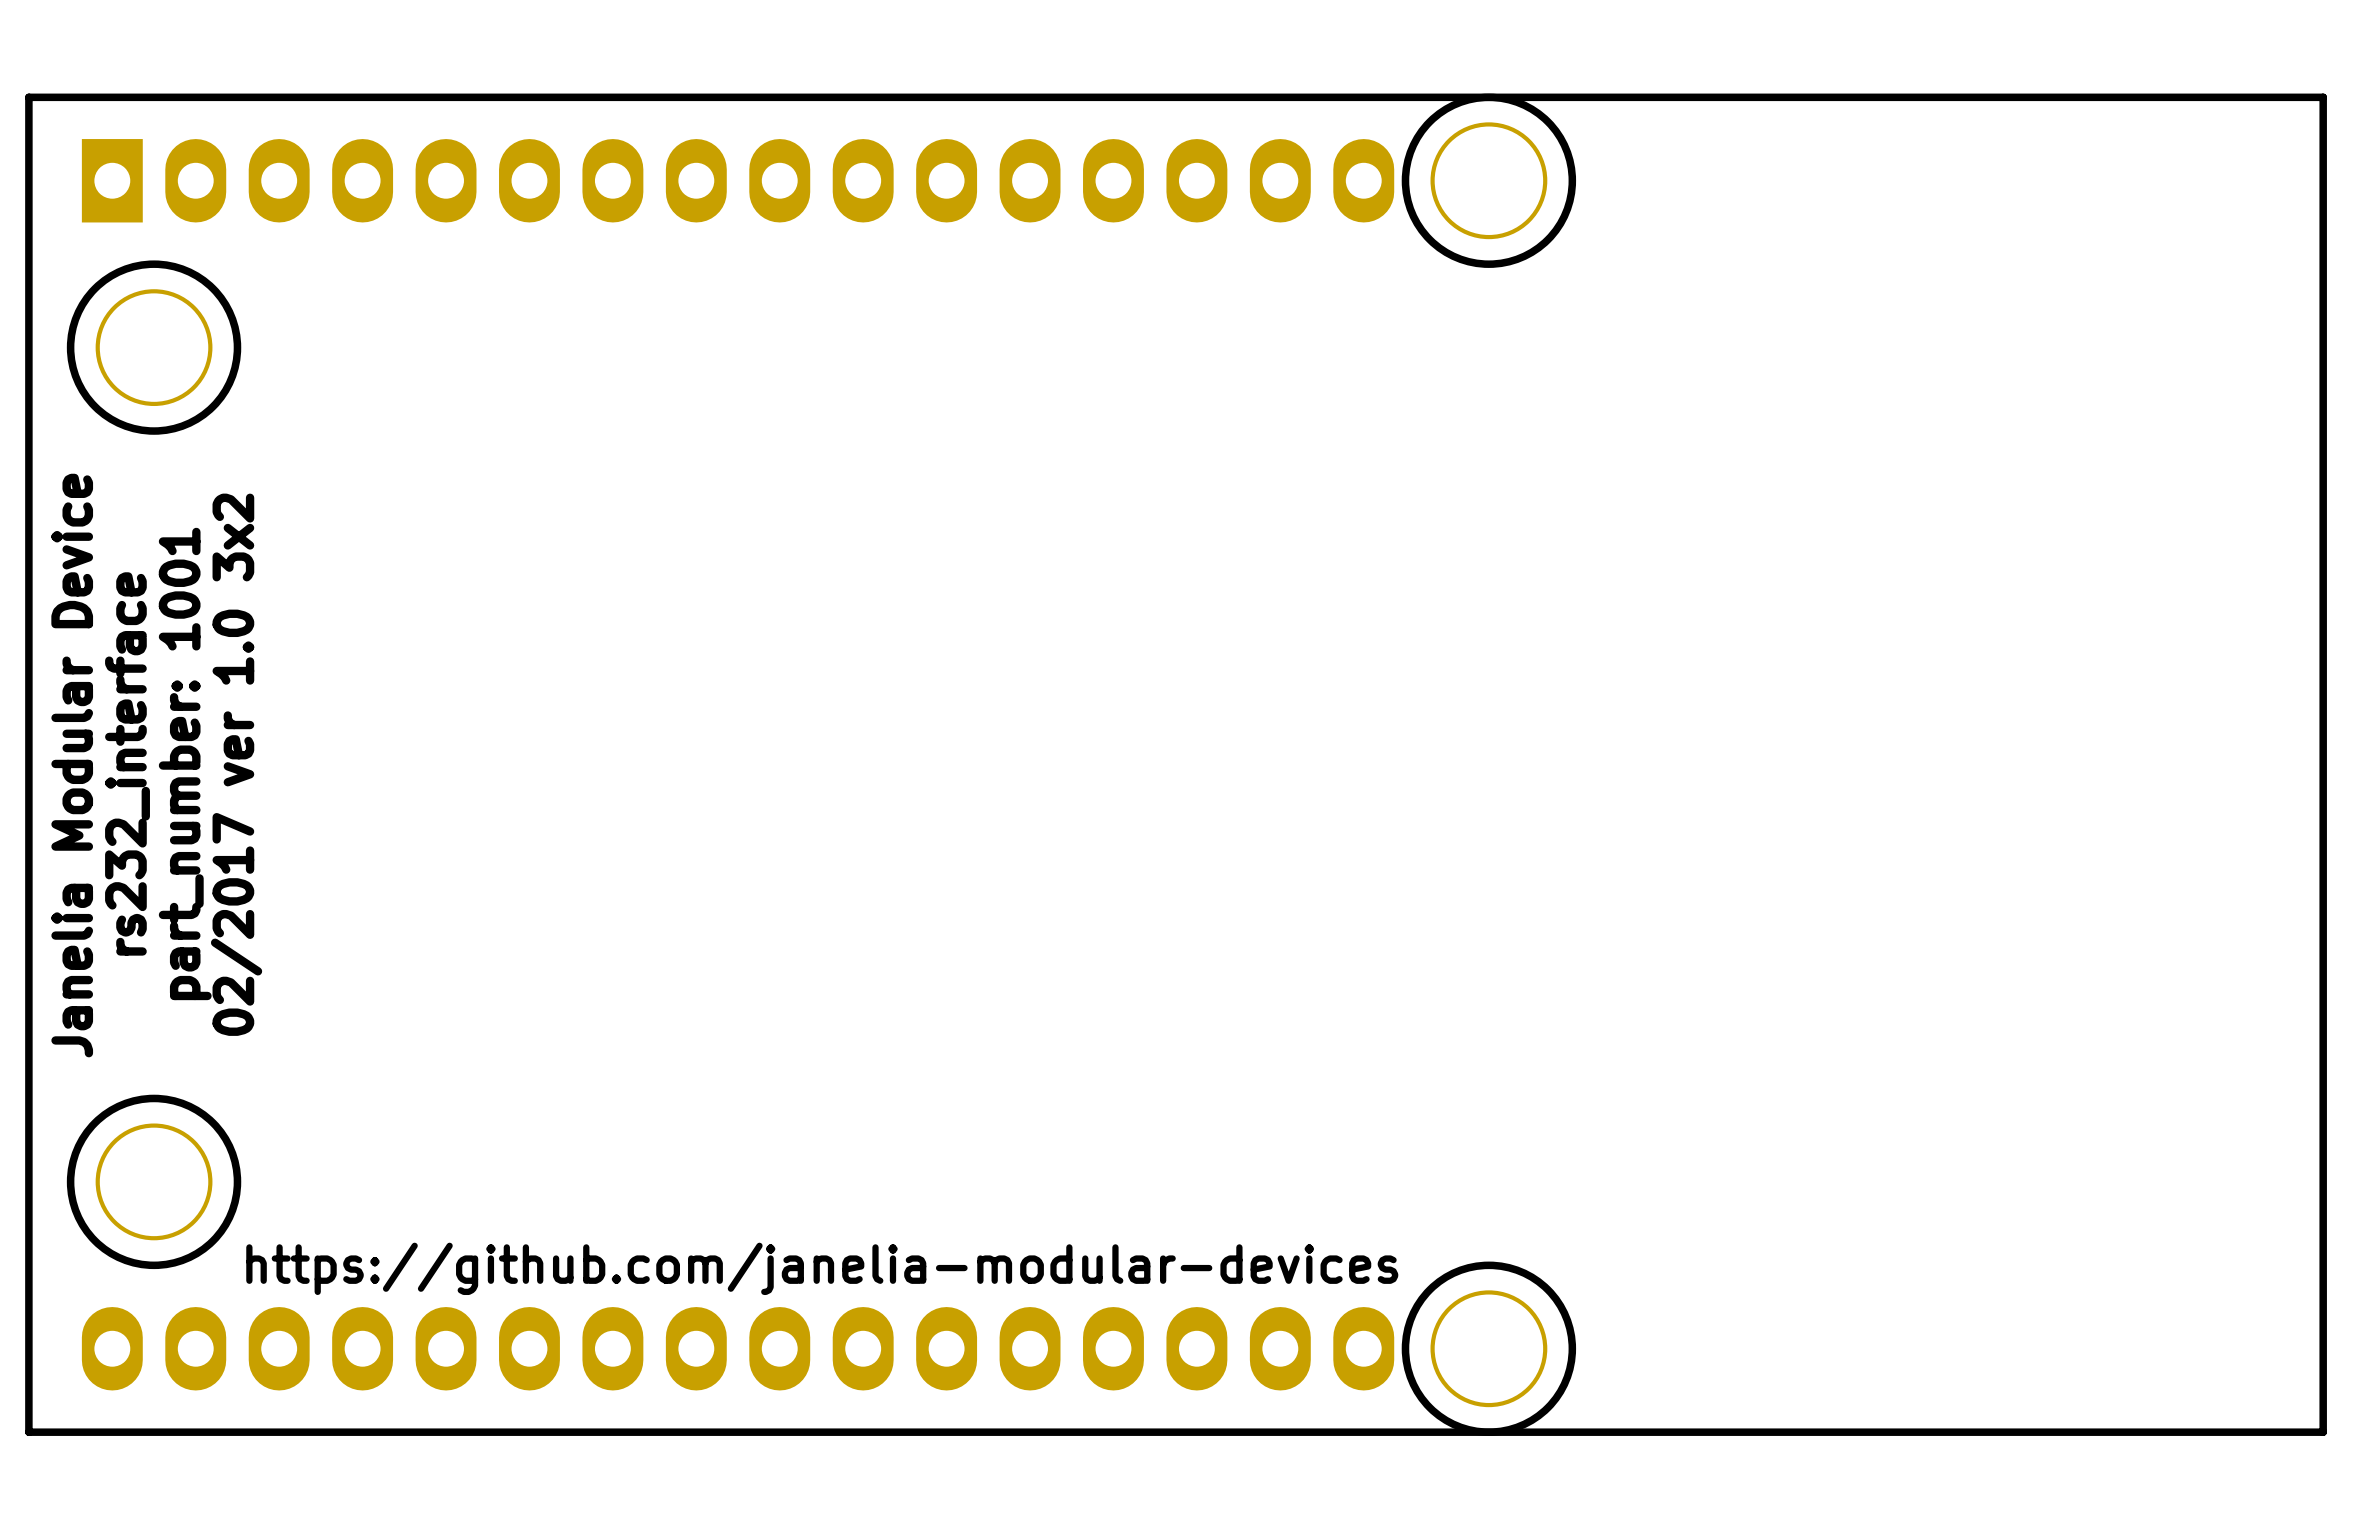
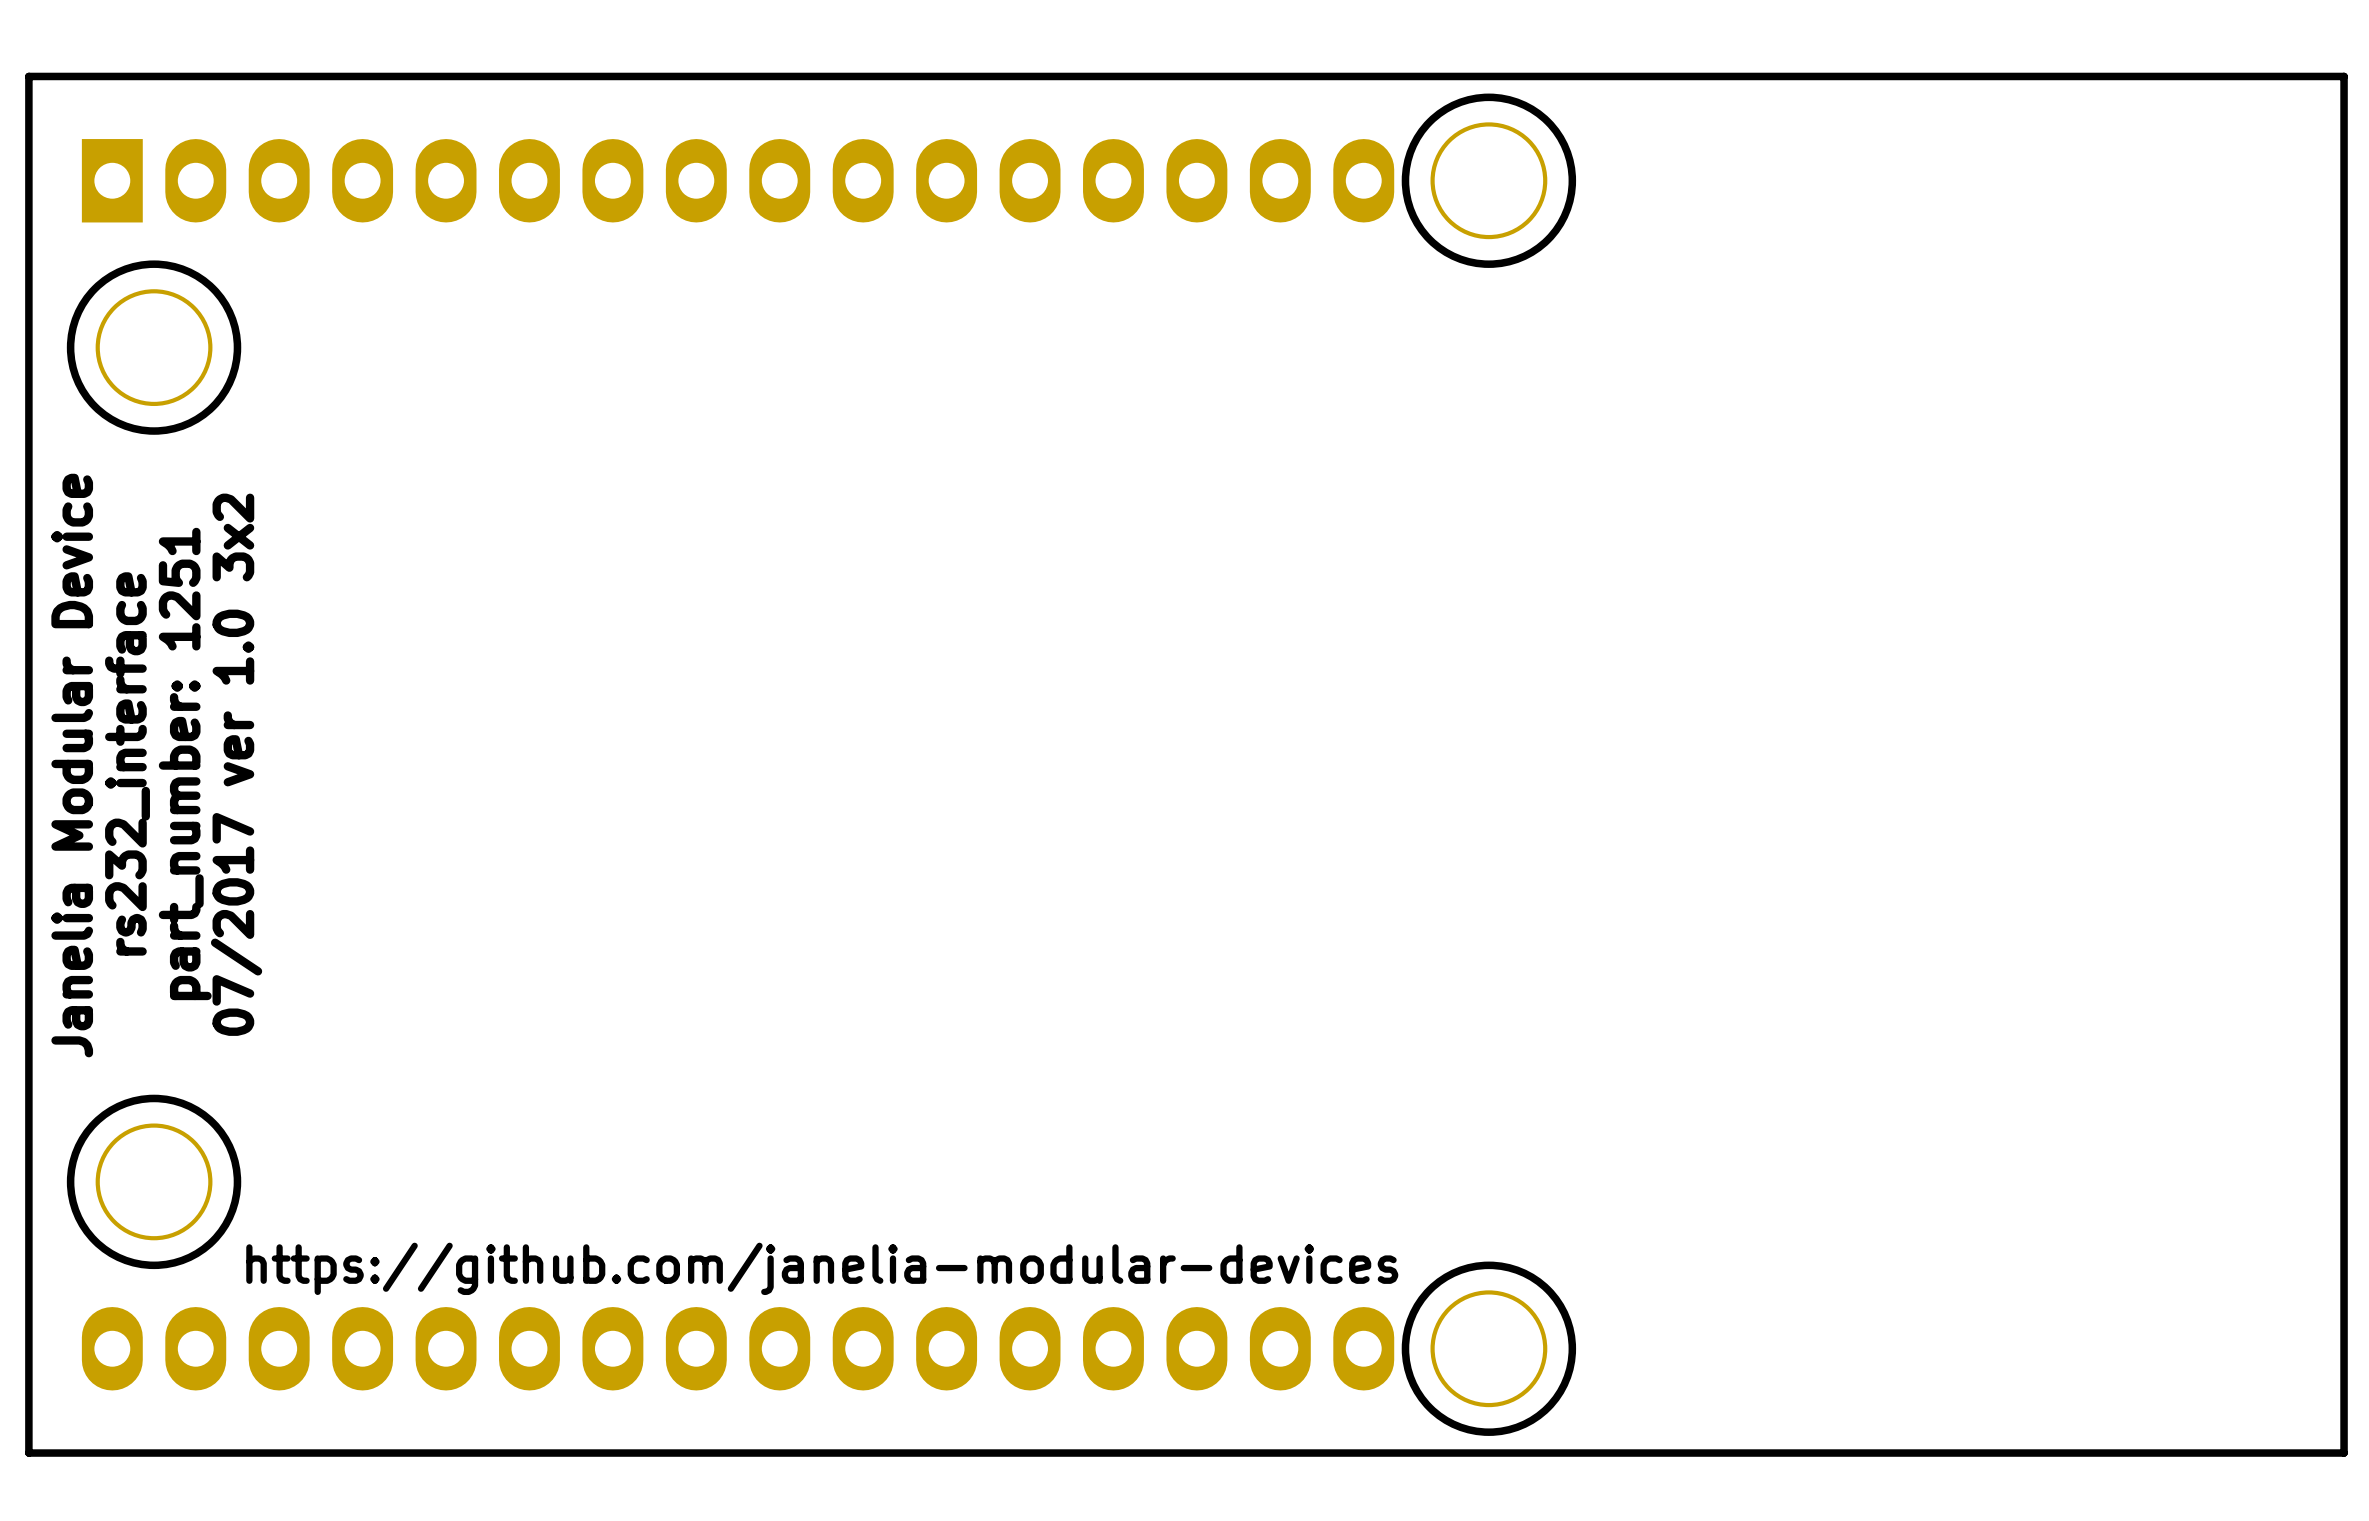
board edge: (28, 97) (2323, 97) (2323, 1432) (28, 1432) -> (28, 97) (28, 76) (2344, 76) (2344, 1453) (28, 1453) (28, 1432)
text: part_number: 1001 (185, 763) -> part_number: 1251 (185, 763)
text: 02/2017 ver 1.0 3x2 (236, 764) -> 07/2017 ver 1.0 3x2 (236, 764)

